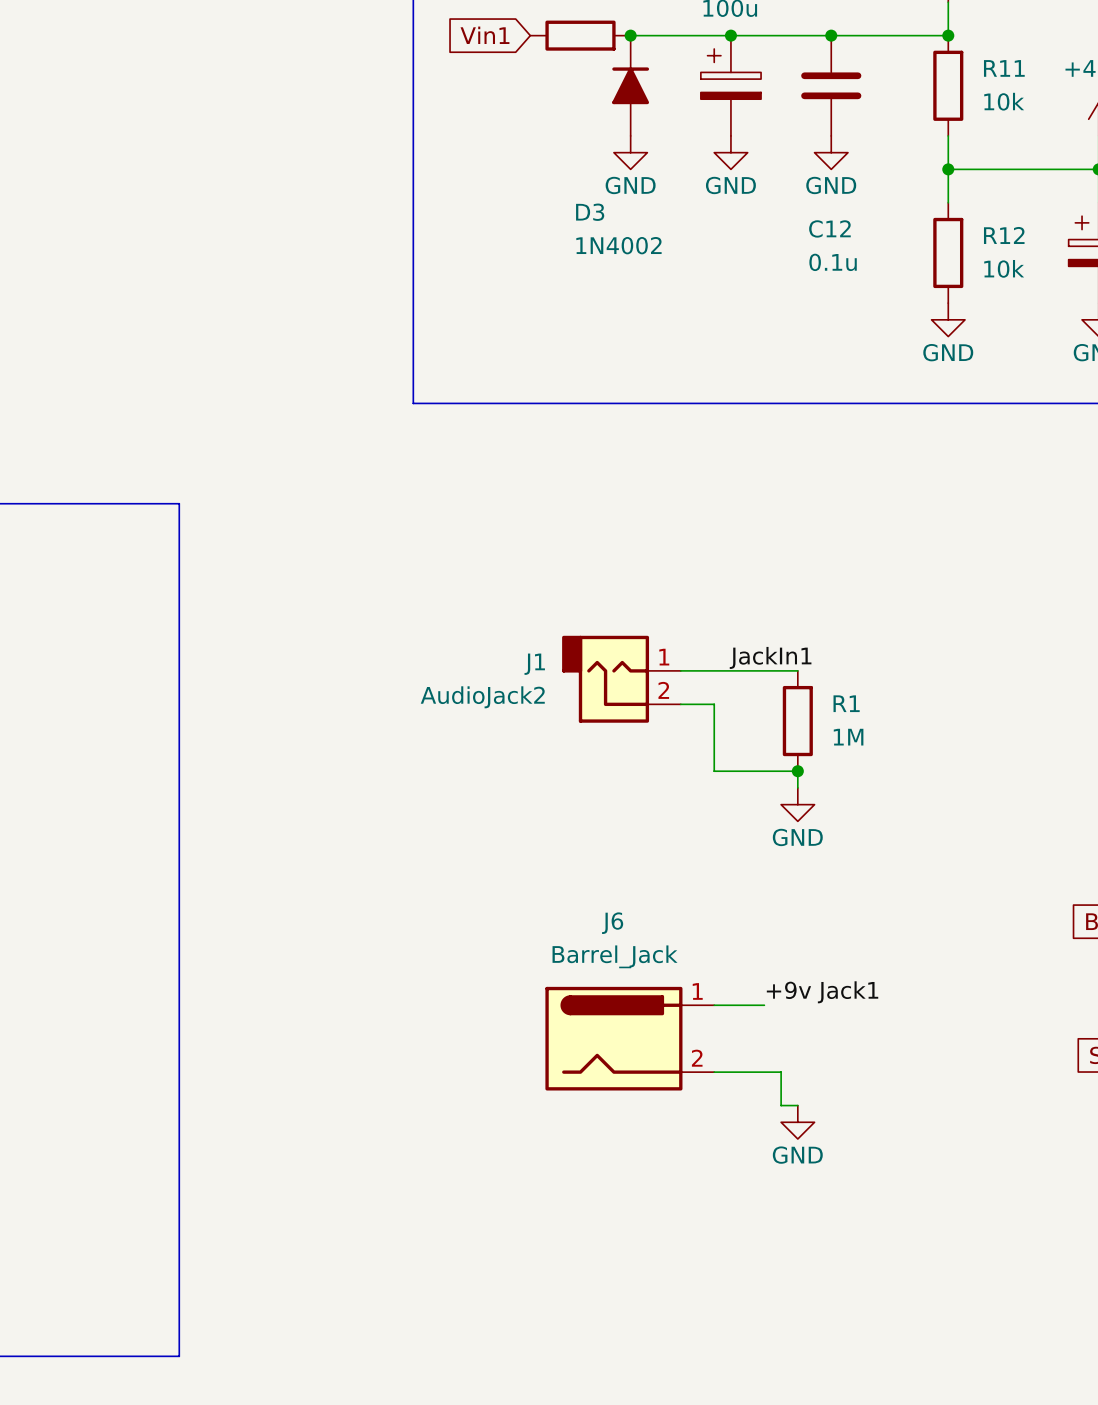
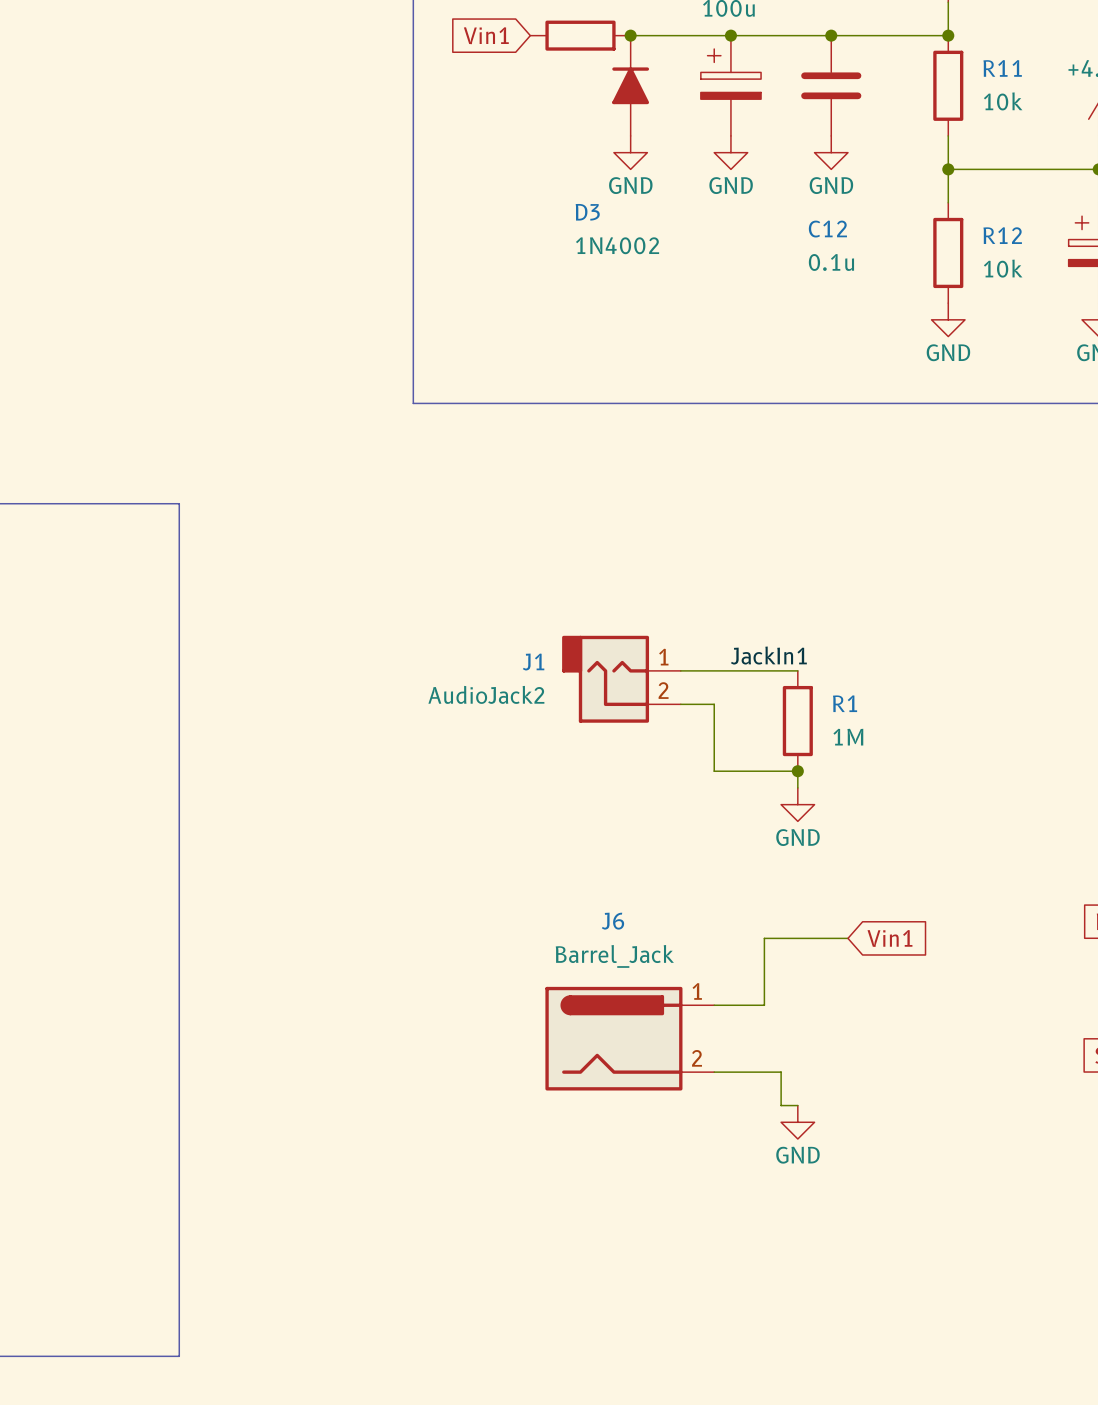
wire: none -> (847, 938) (764, 938) (764, 1005)
global label: none -> Vin1 (889, 938)
label: +9v Jack1 (822, 992) -> none

